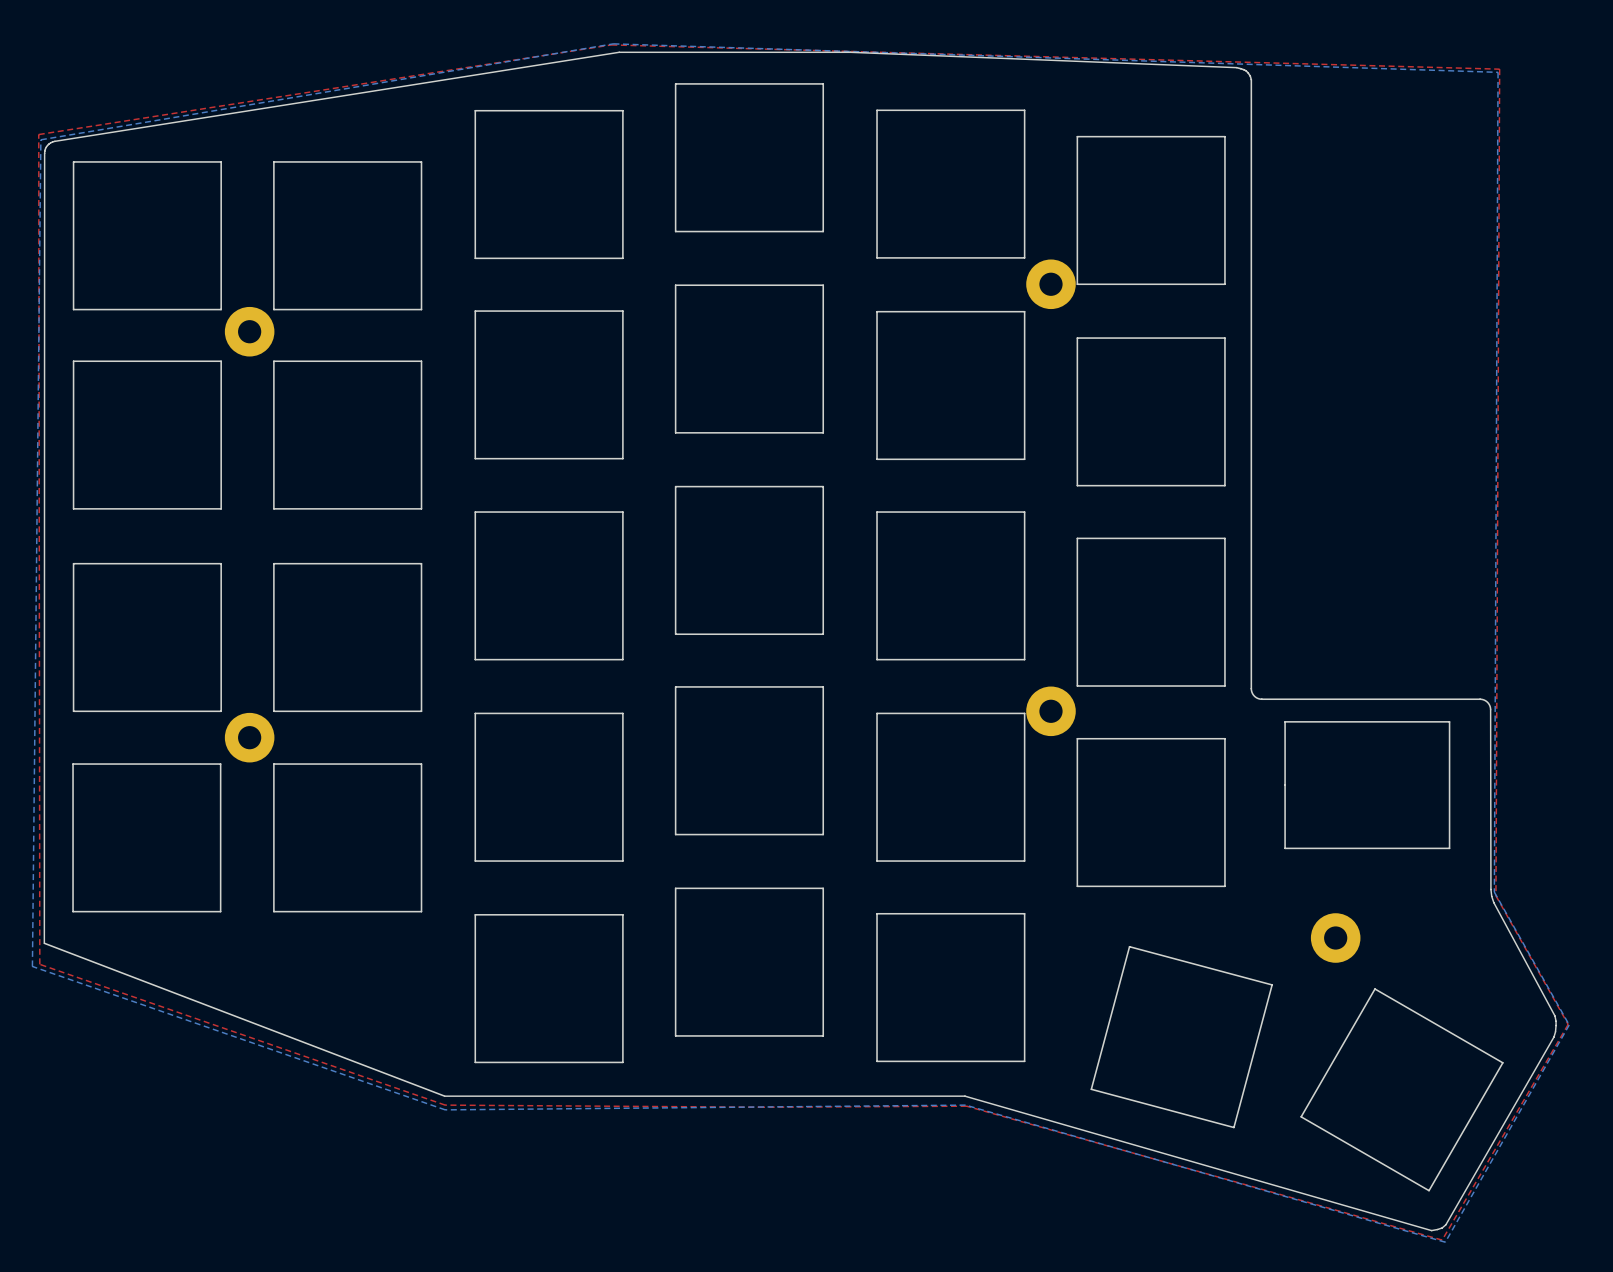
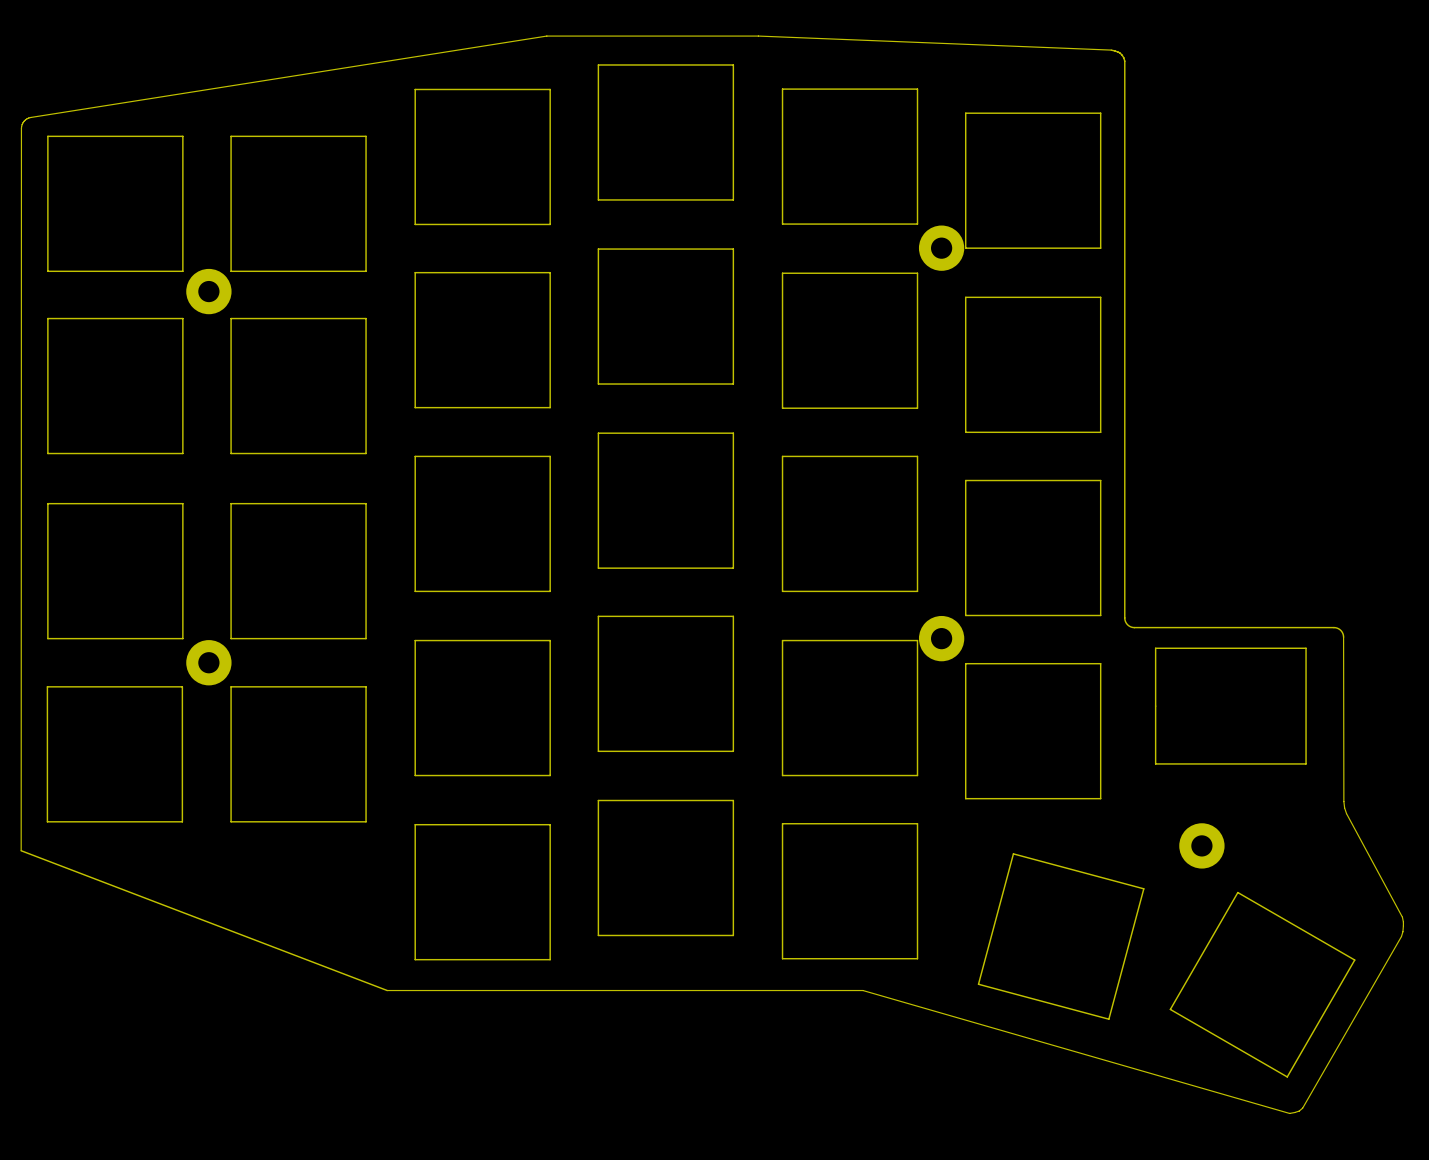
bottom zone outline: (613, 43) (40, 139) (32, 966) (445, 1109) (965, 1105) (1445, 1242) (1569, 1024) (1494, 892) (1498, 72) (613, 43) -> none
top zone outline: (611, 44) (38, 134) (39, 964) (445, 1105) (966, 1106) (1442, 1240) (1568, 1024) (1495, 895) (1499, 69) (611, 44) -> none

